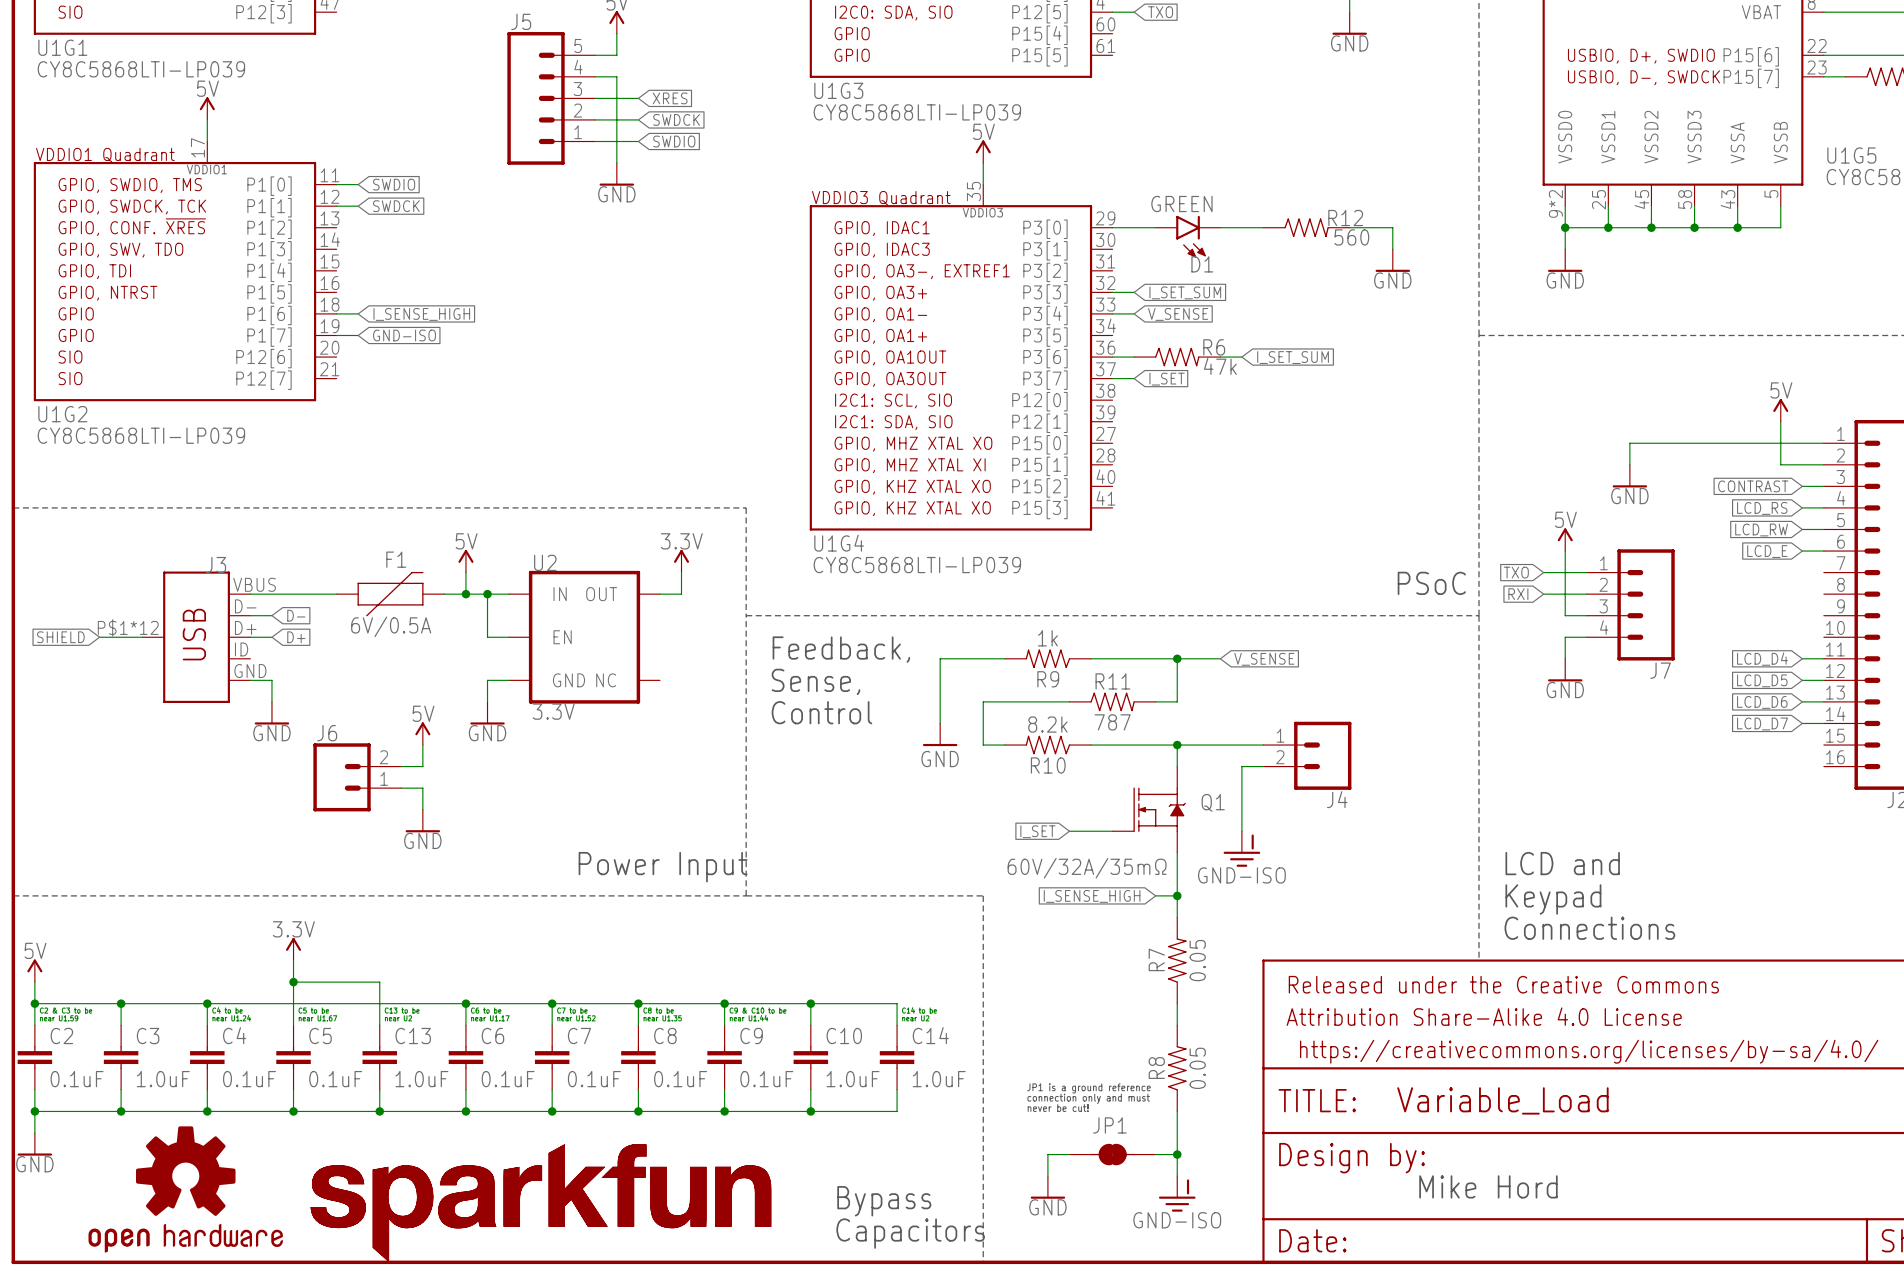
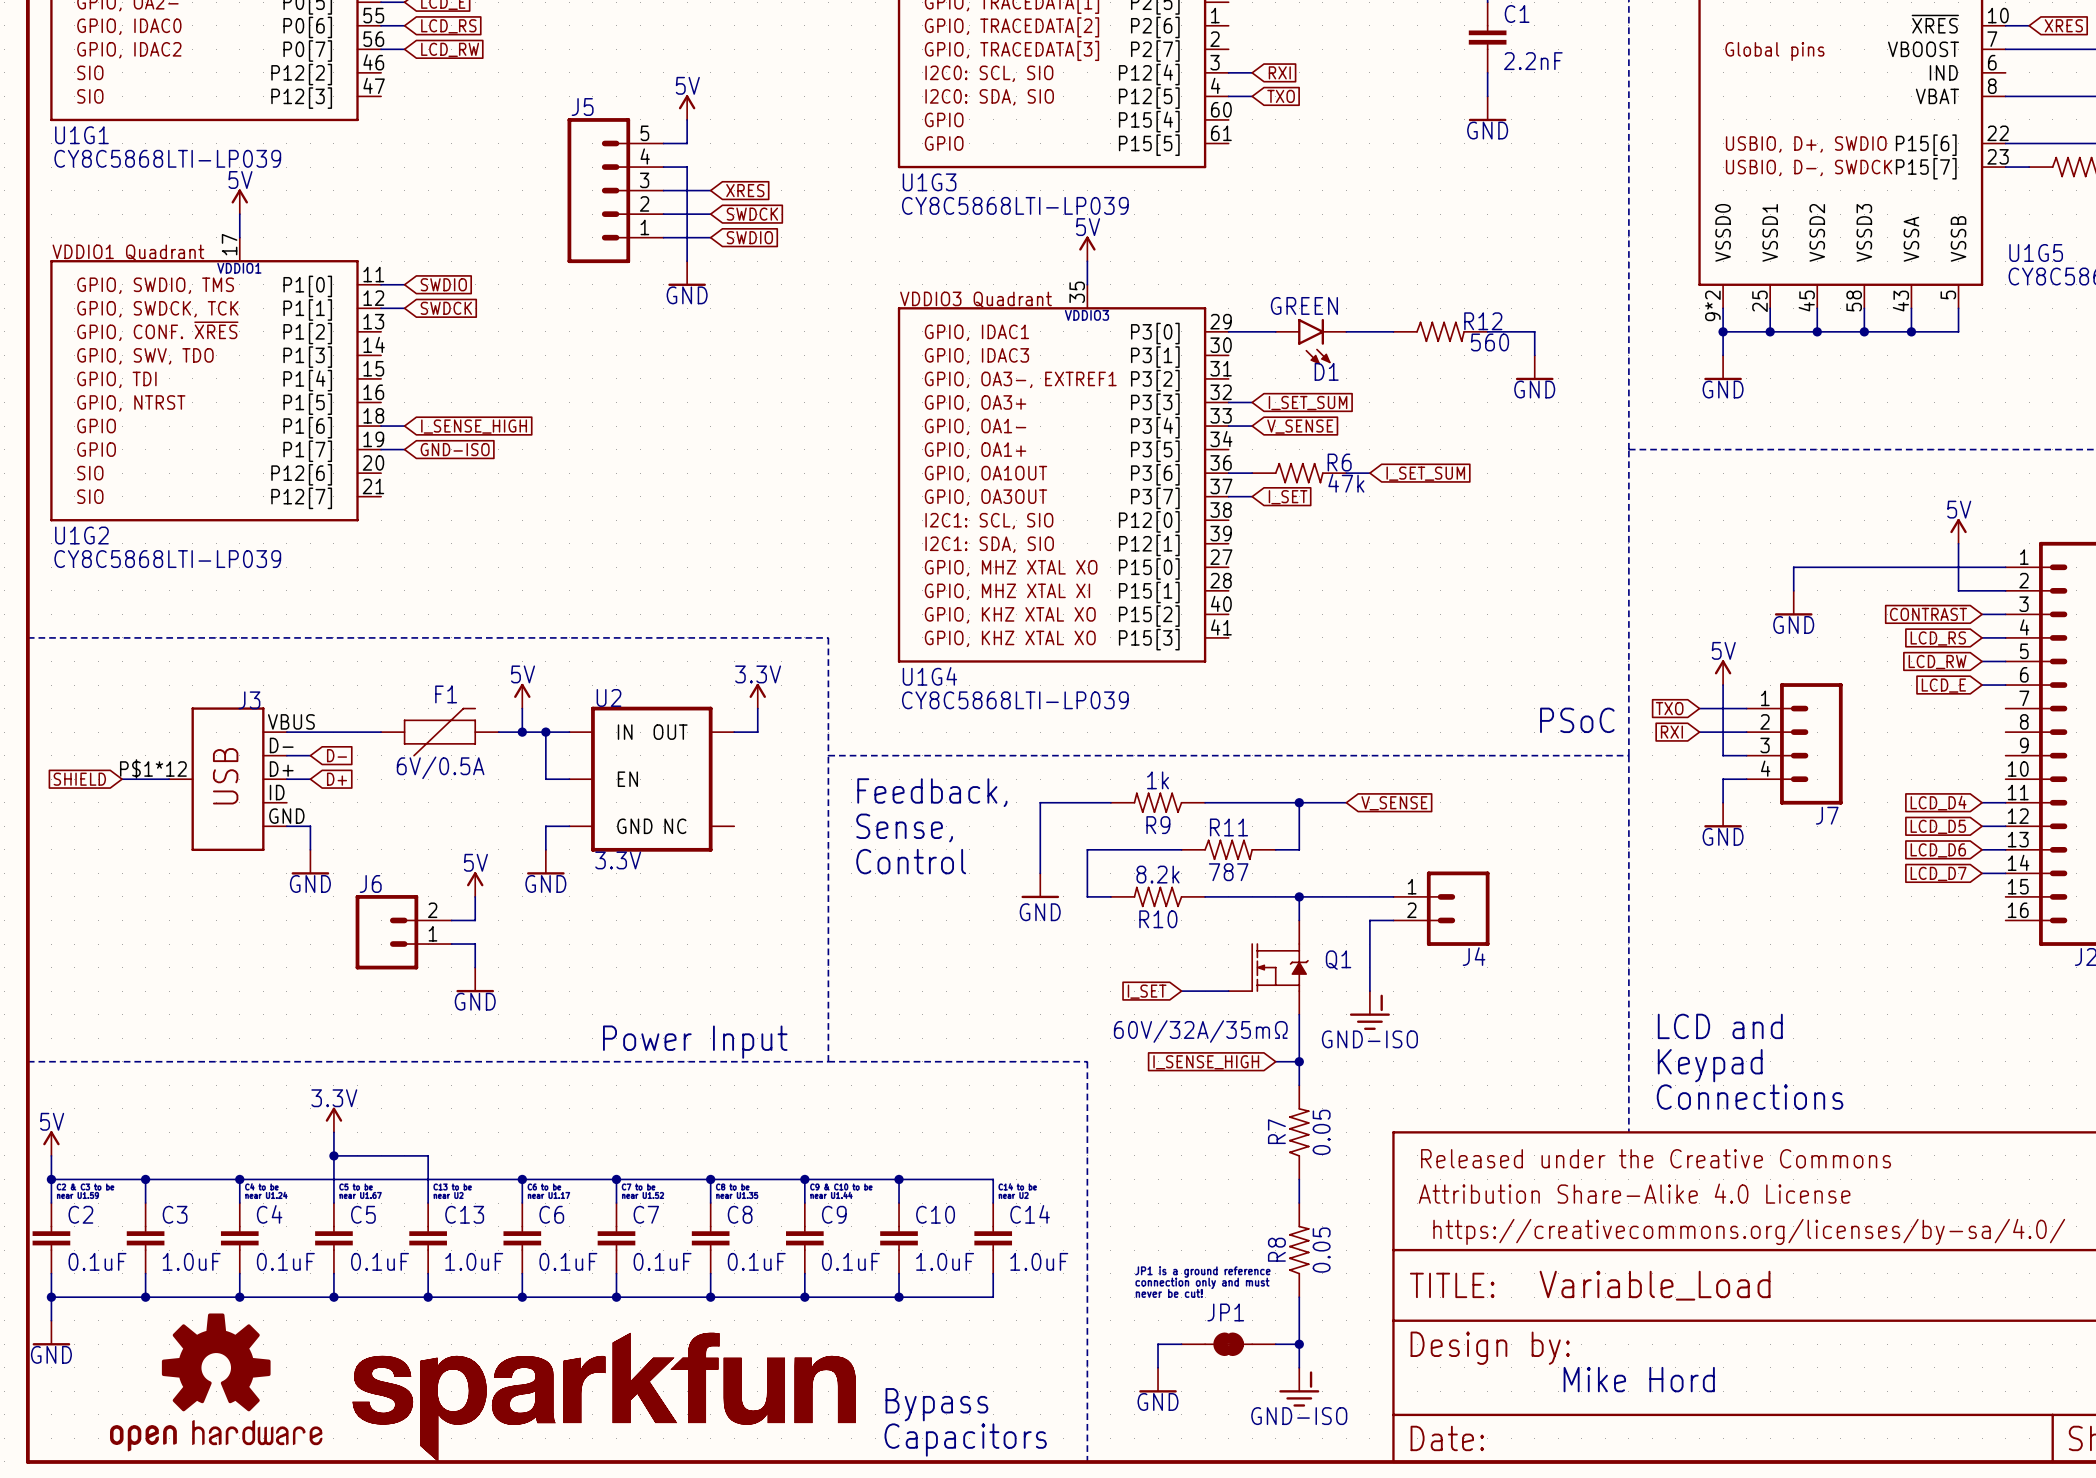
text position: Power Input (663, 867) -> Power Input (695, 1042)
text position: Bypass (884, 1201) -> Bypass (936, 1404)
text position: Capacitors (910, 1233) -> Capacitors (965, 1440)

